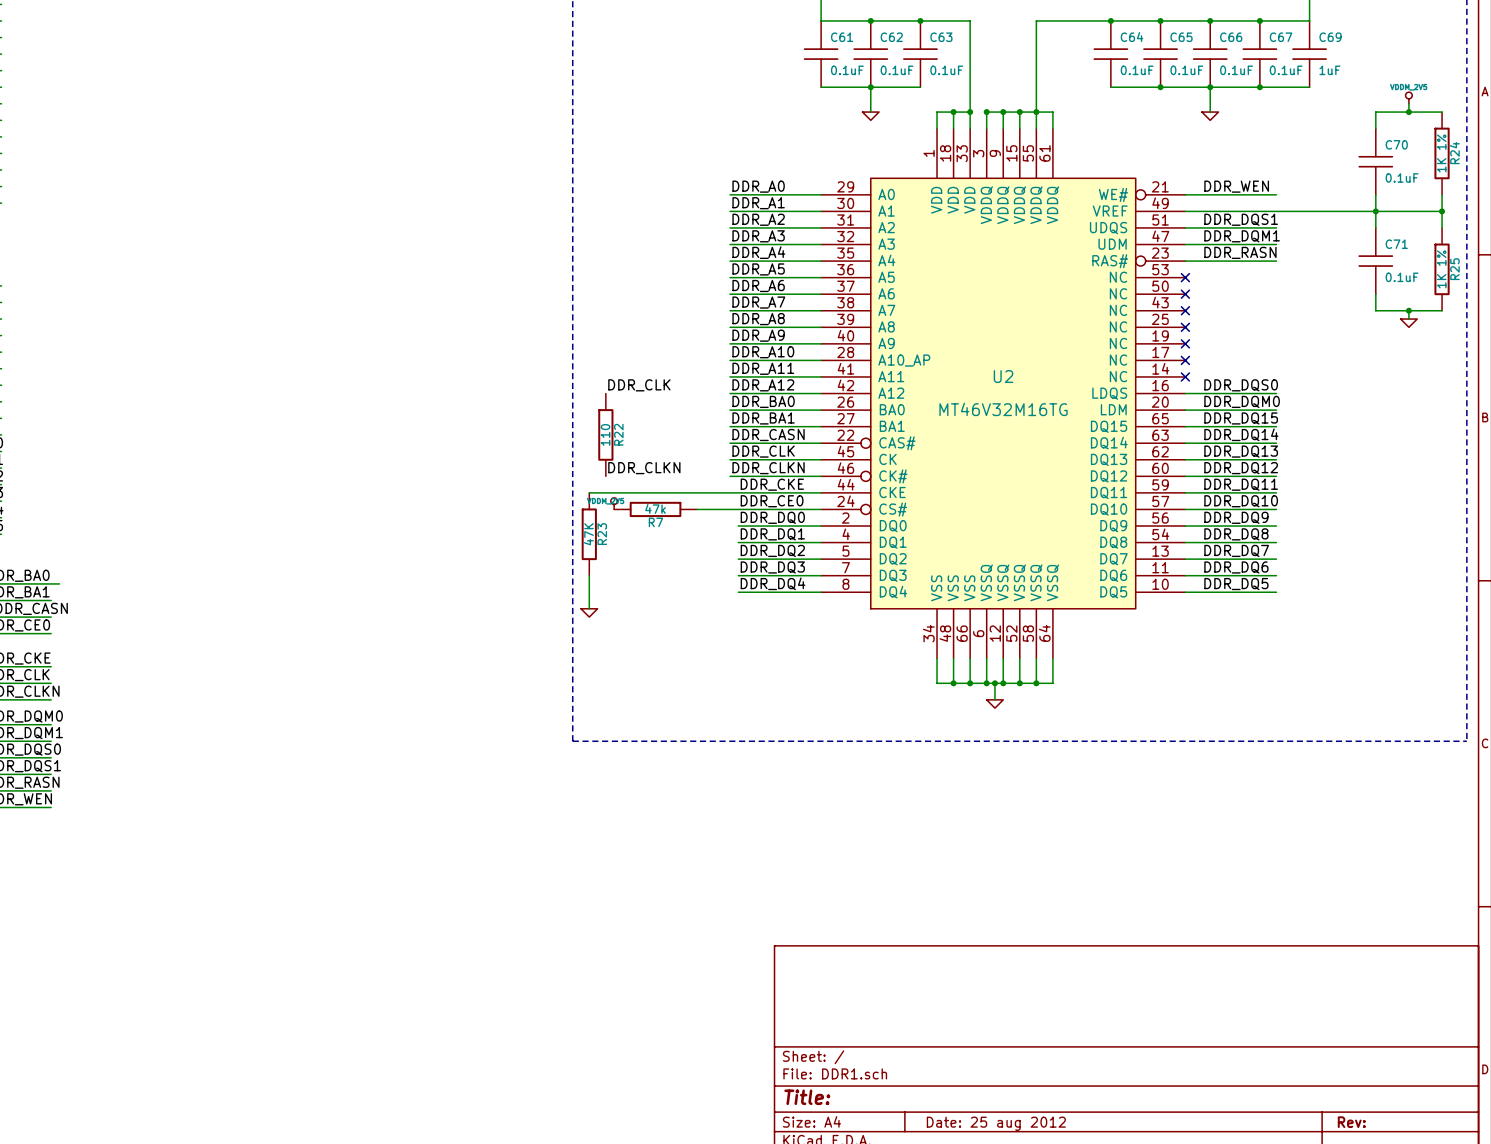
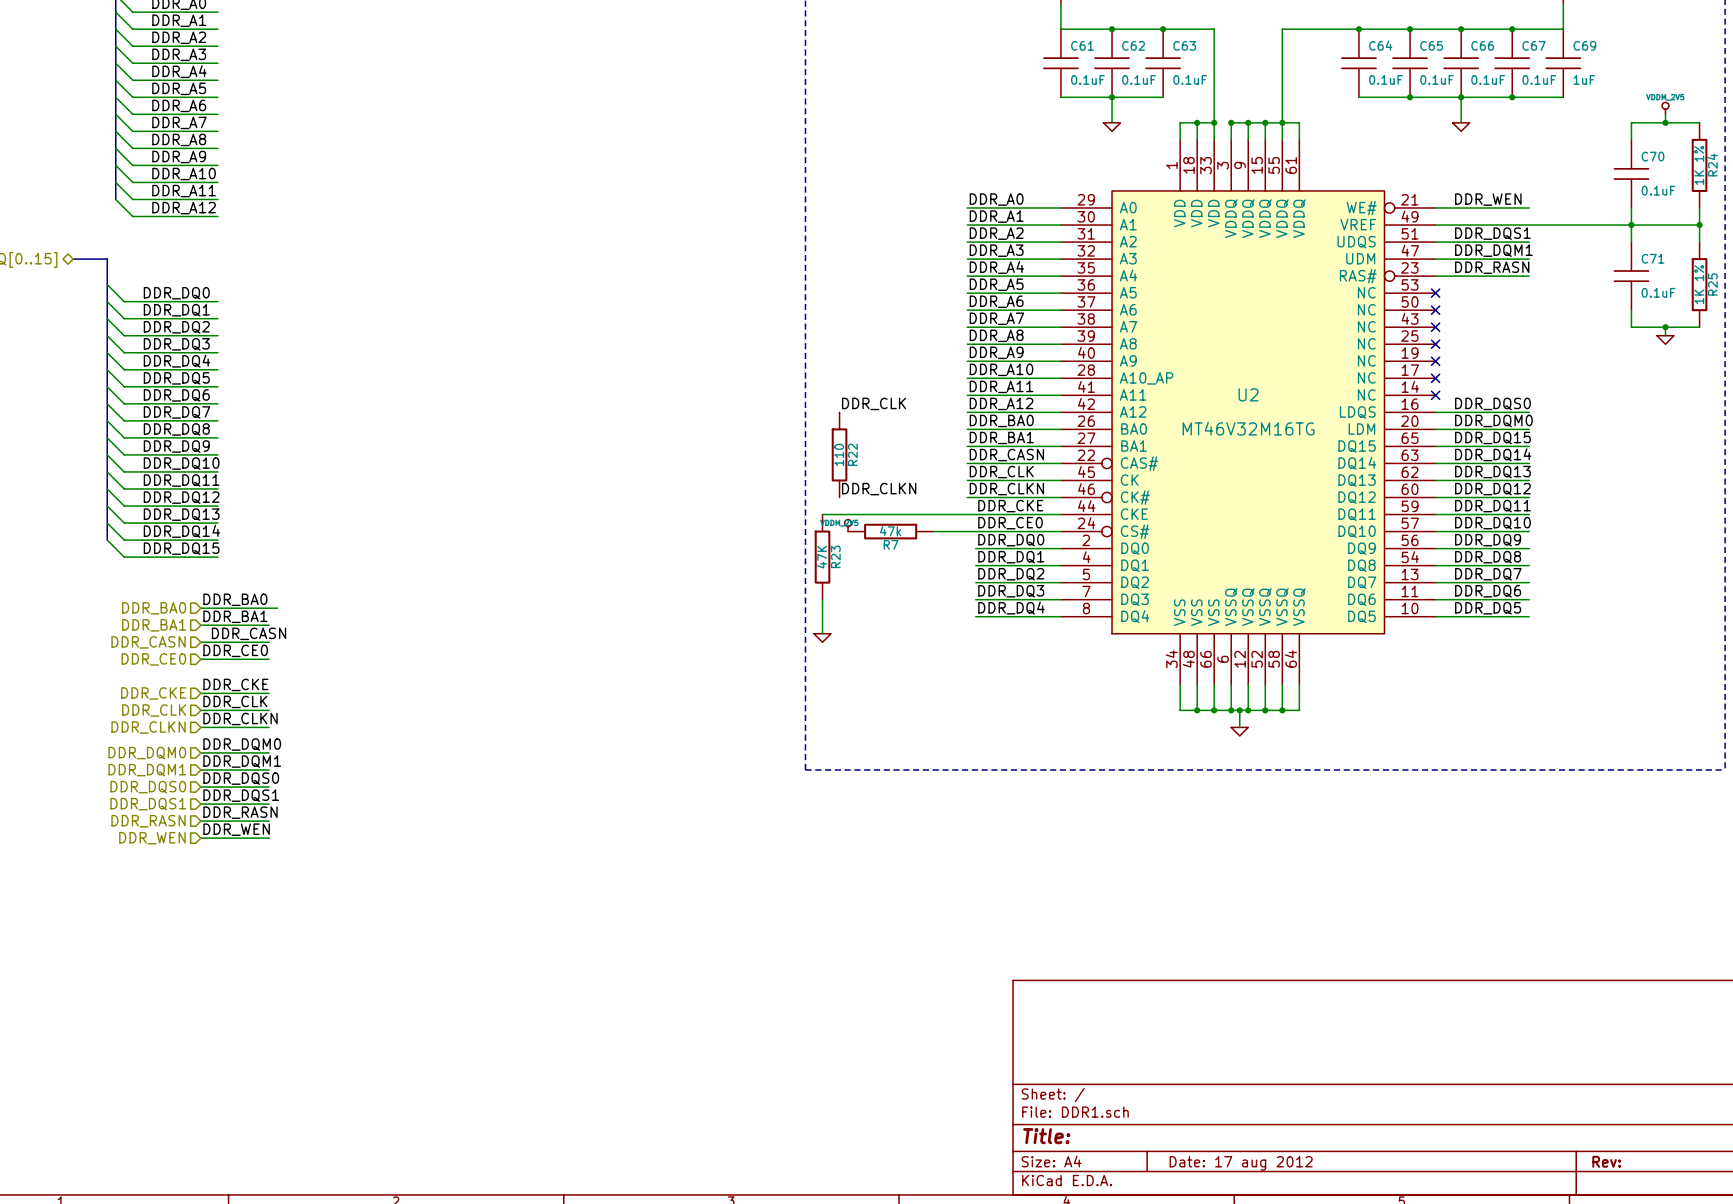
title block: Date: 25 aug 2012 (996, 1123) -> Date: 17 aug 2012 (1241, 1163)

